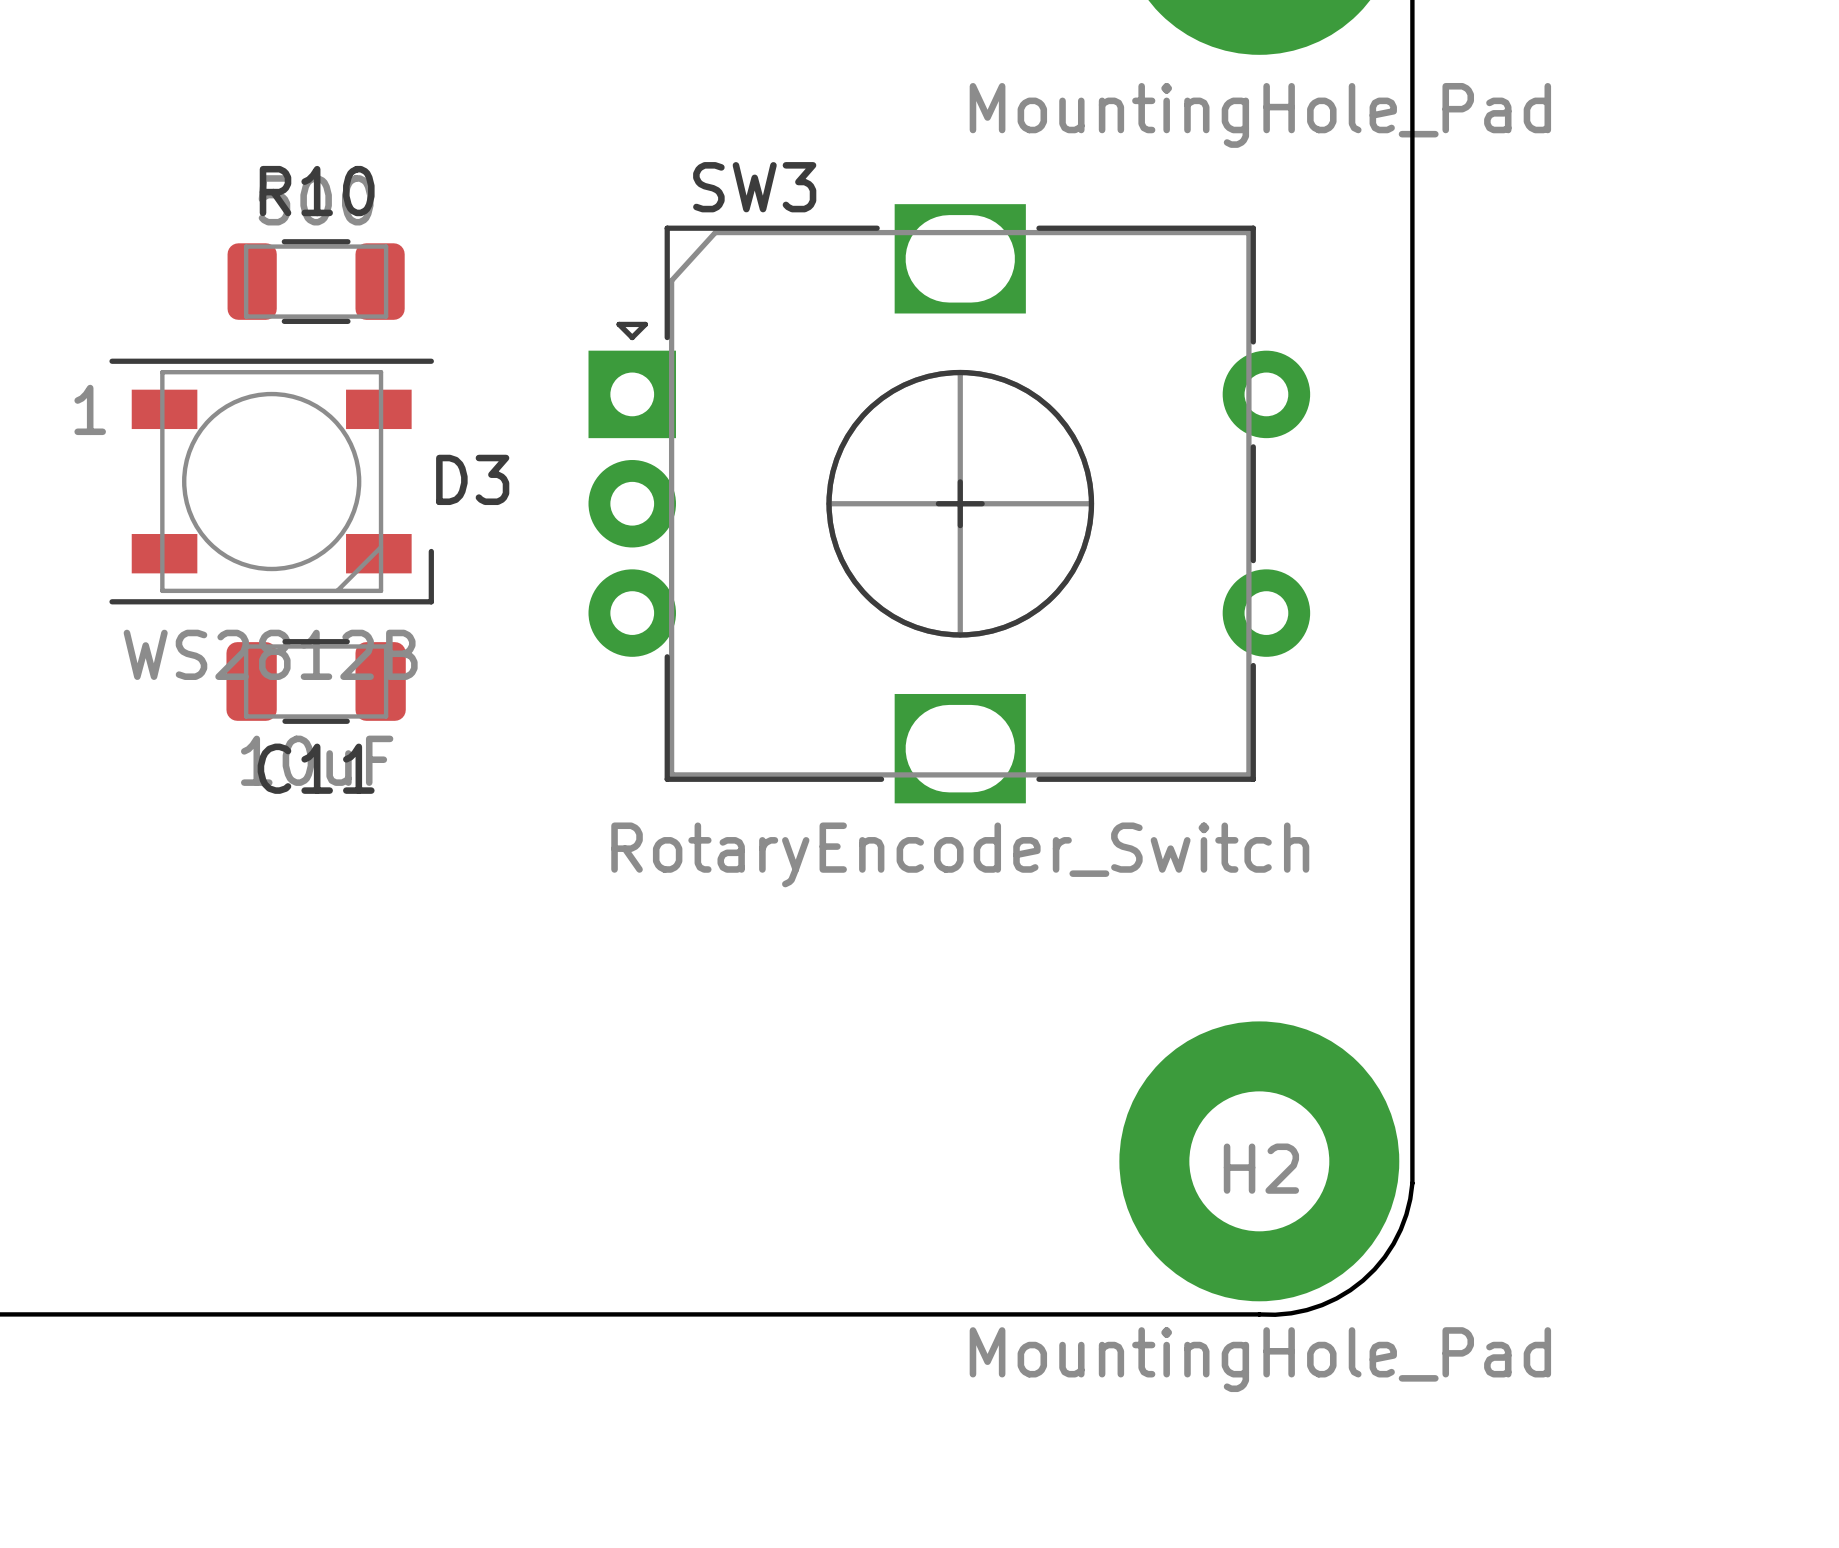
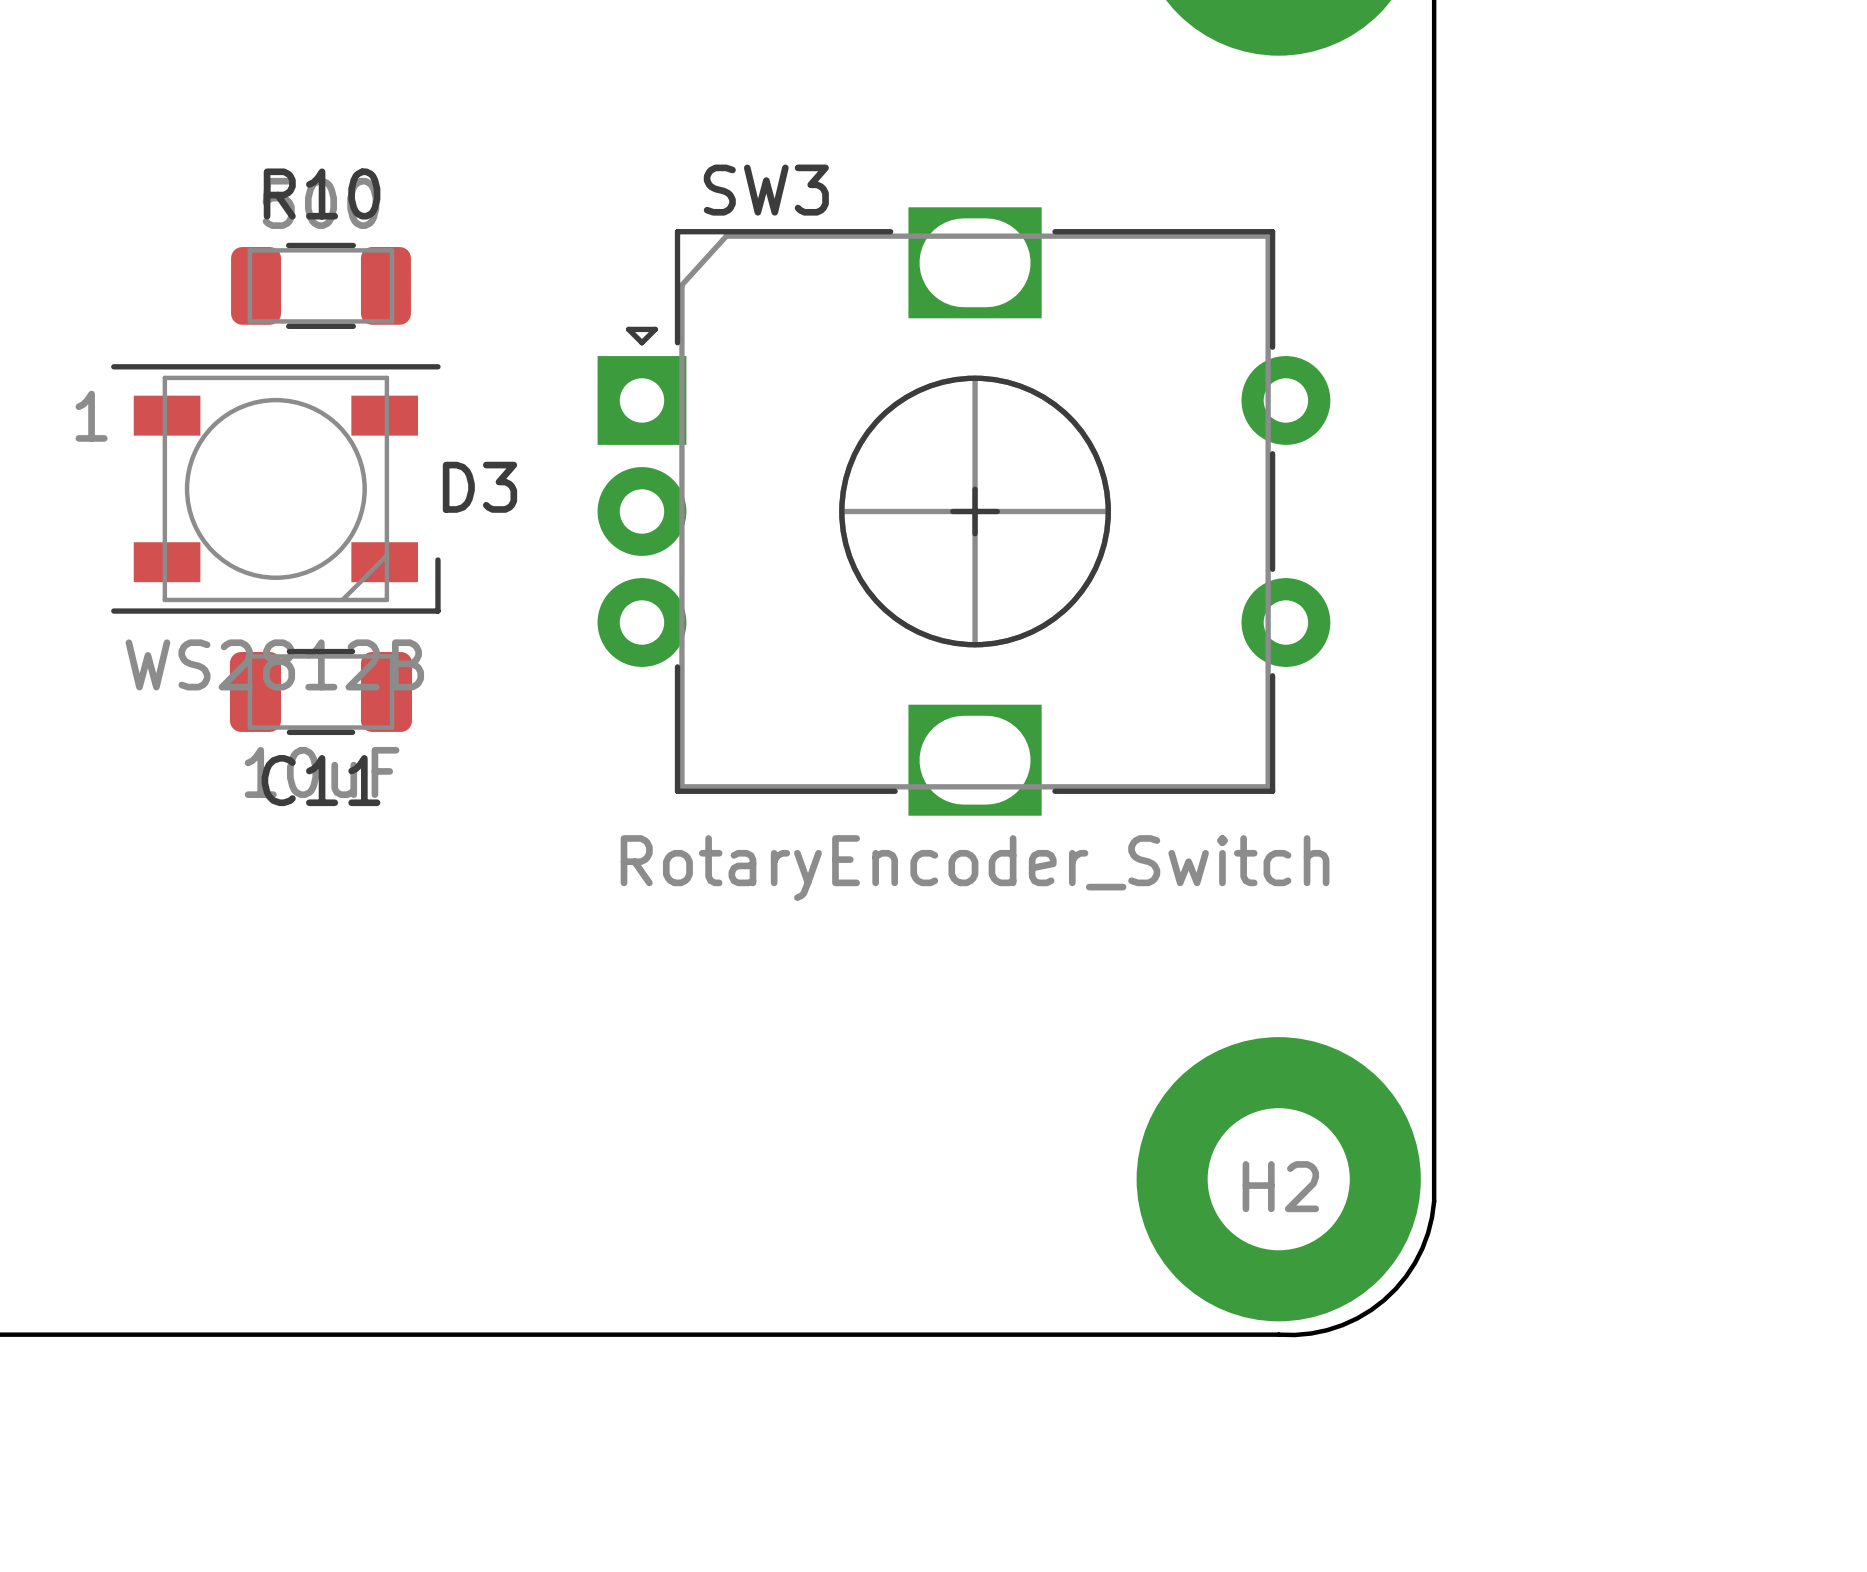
part value: MountingHole_Pad (1260, 115) -> none
H2 value: MountingHole_Pad (1260, 1359) -> none

